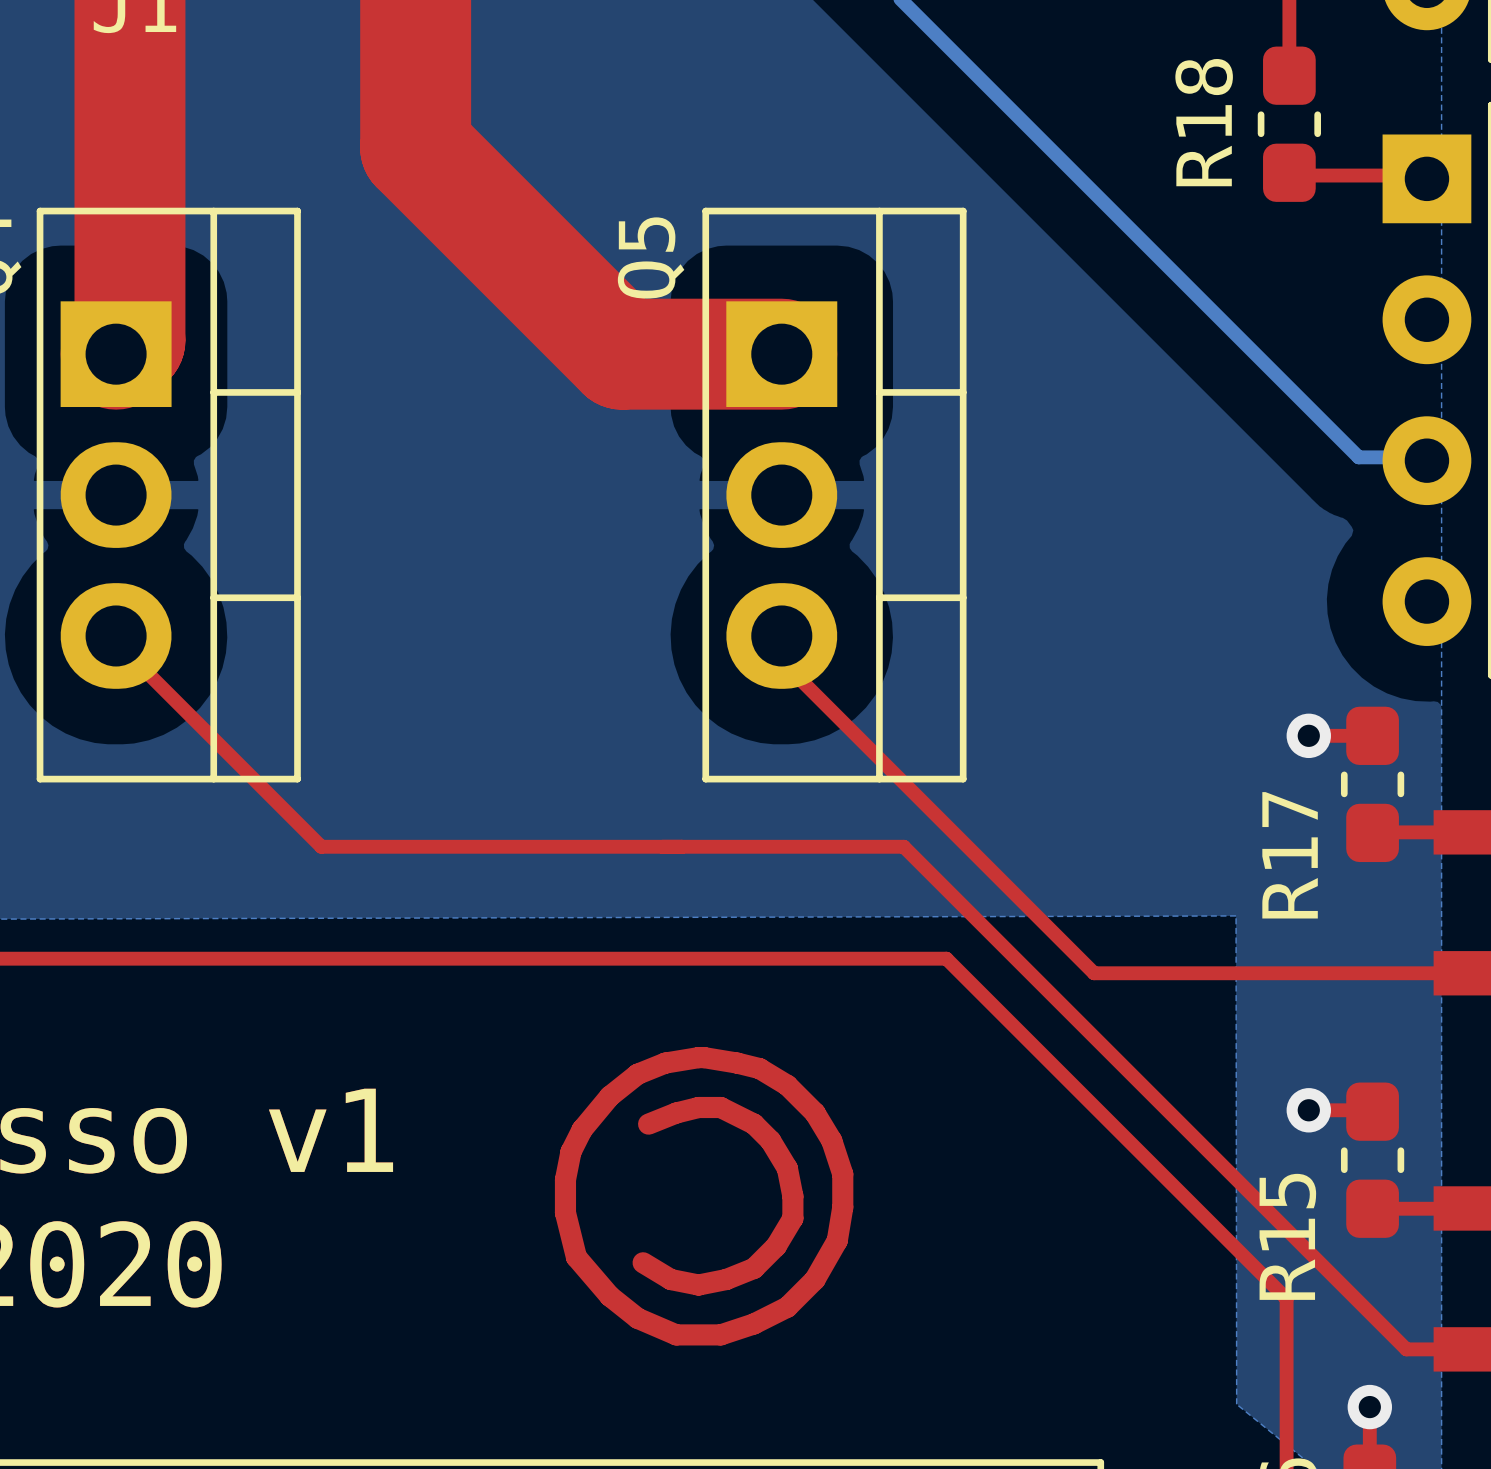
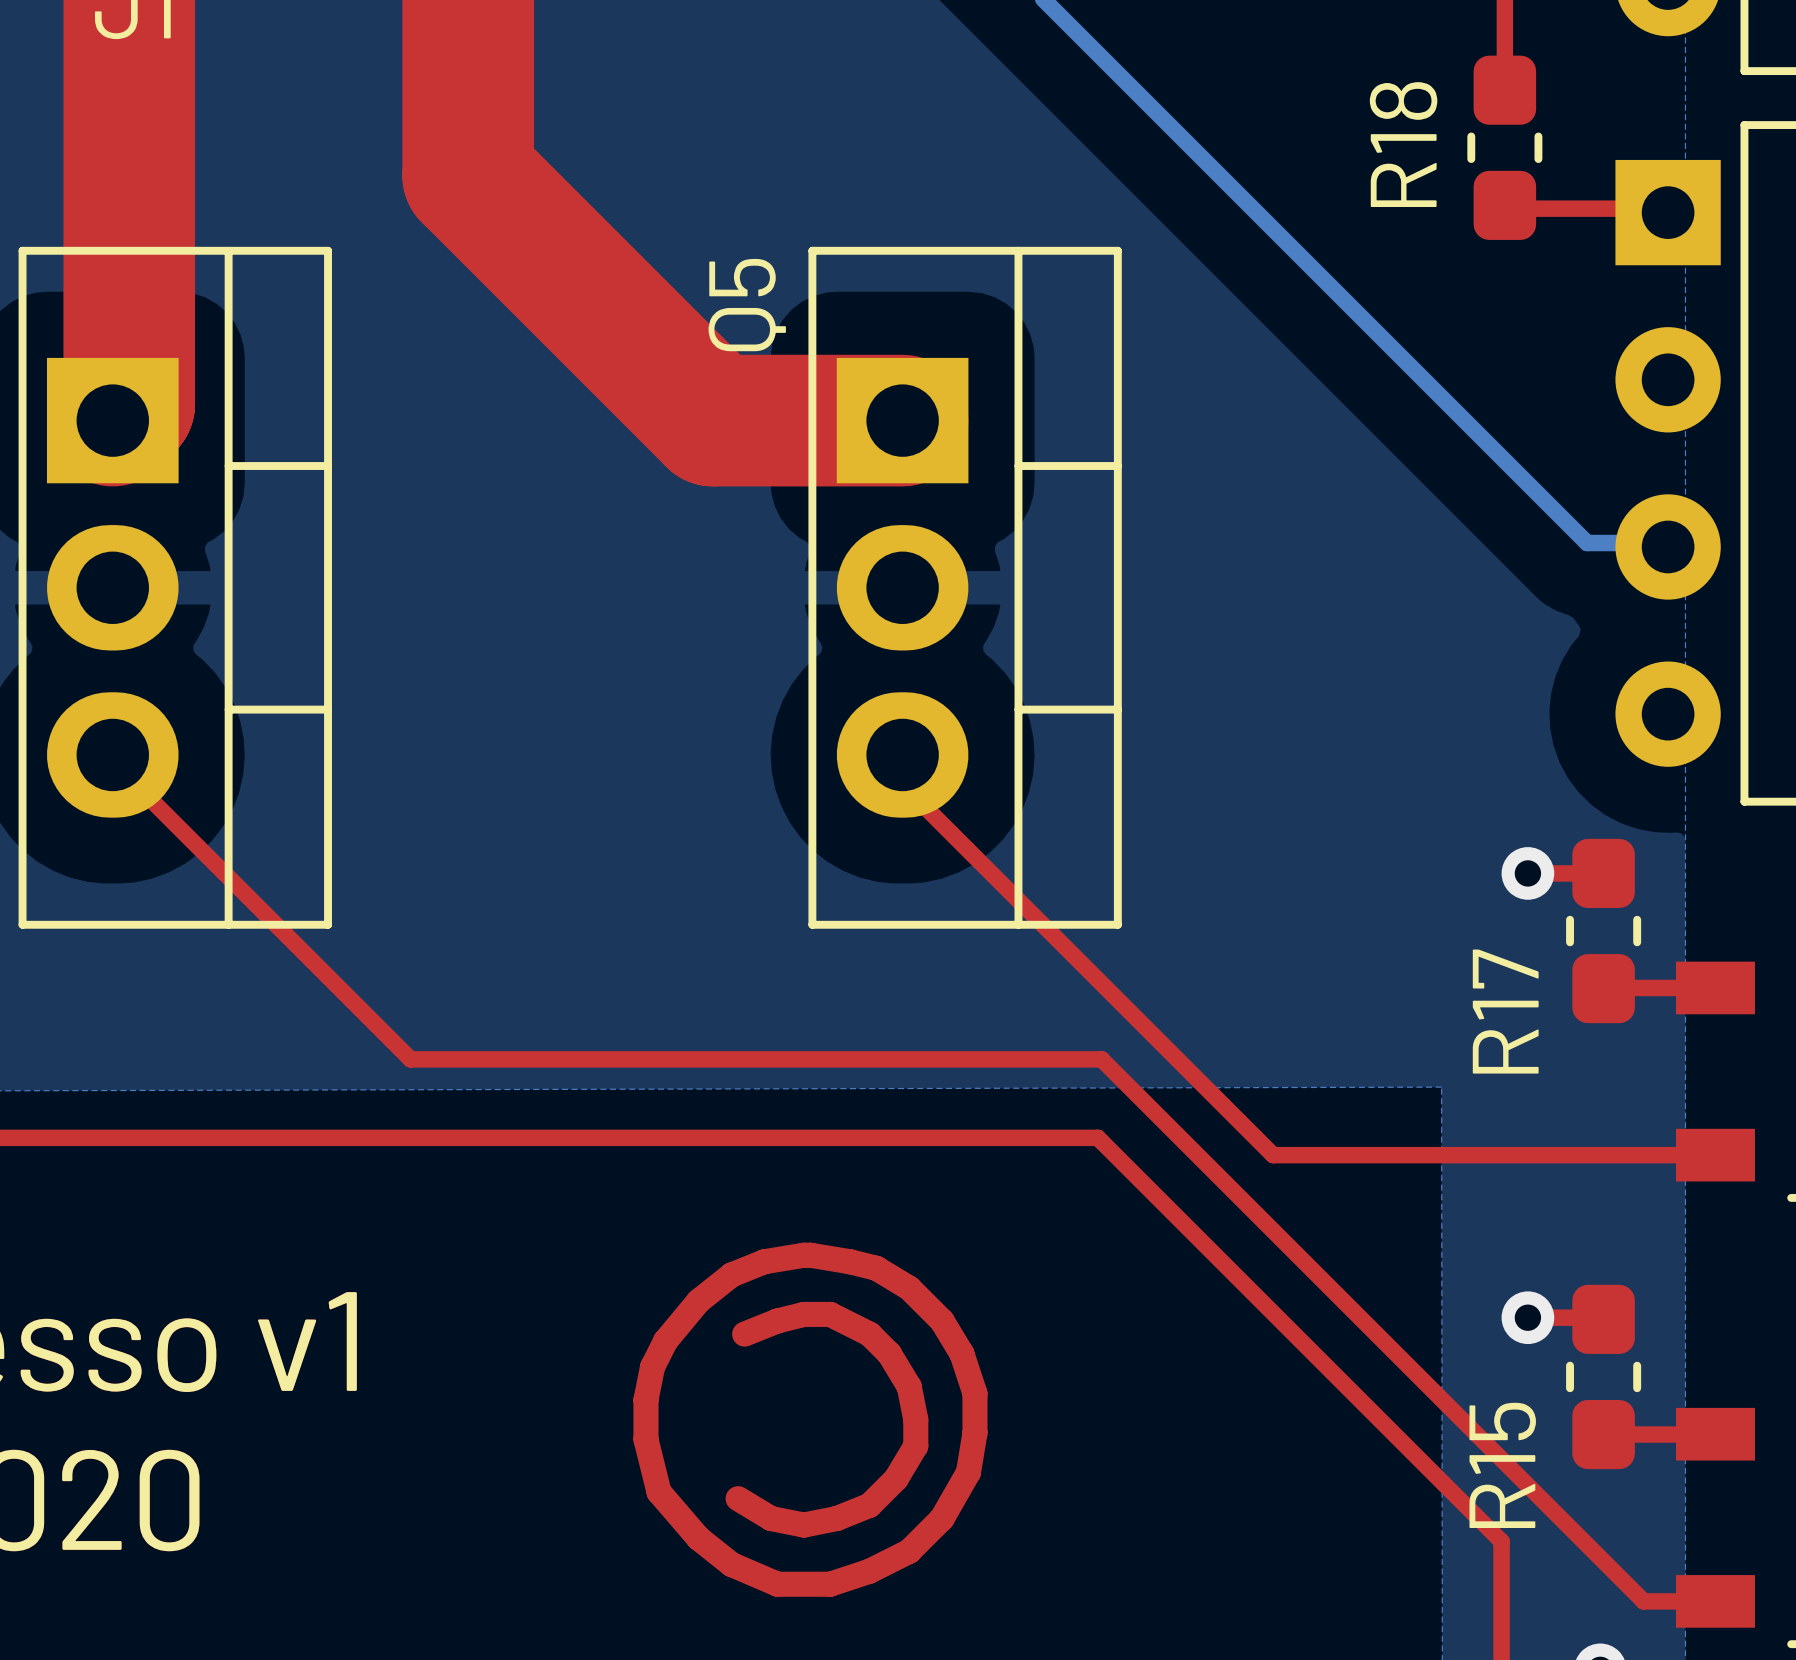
top track: (321, 846) (903, 846) (949, 892) -> (356, 1005) (410, 1059) (1101, 1059)

